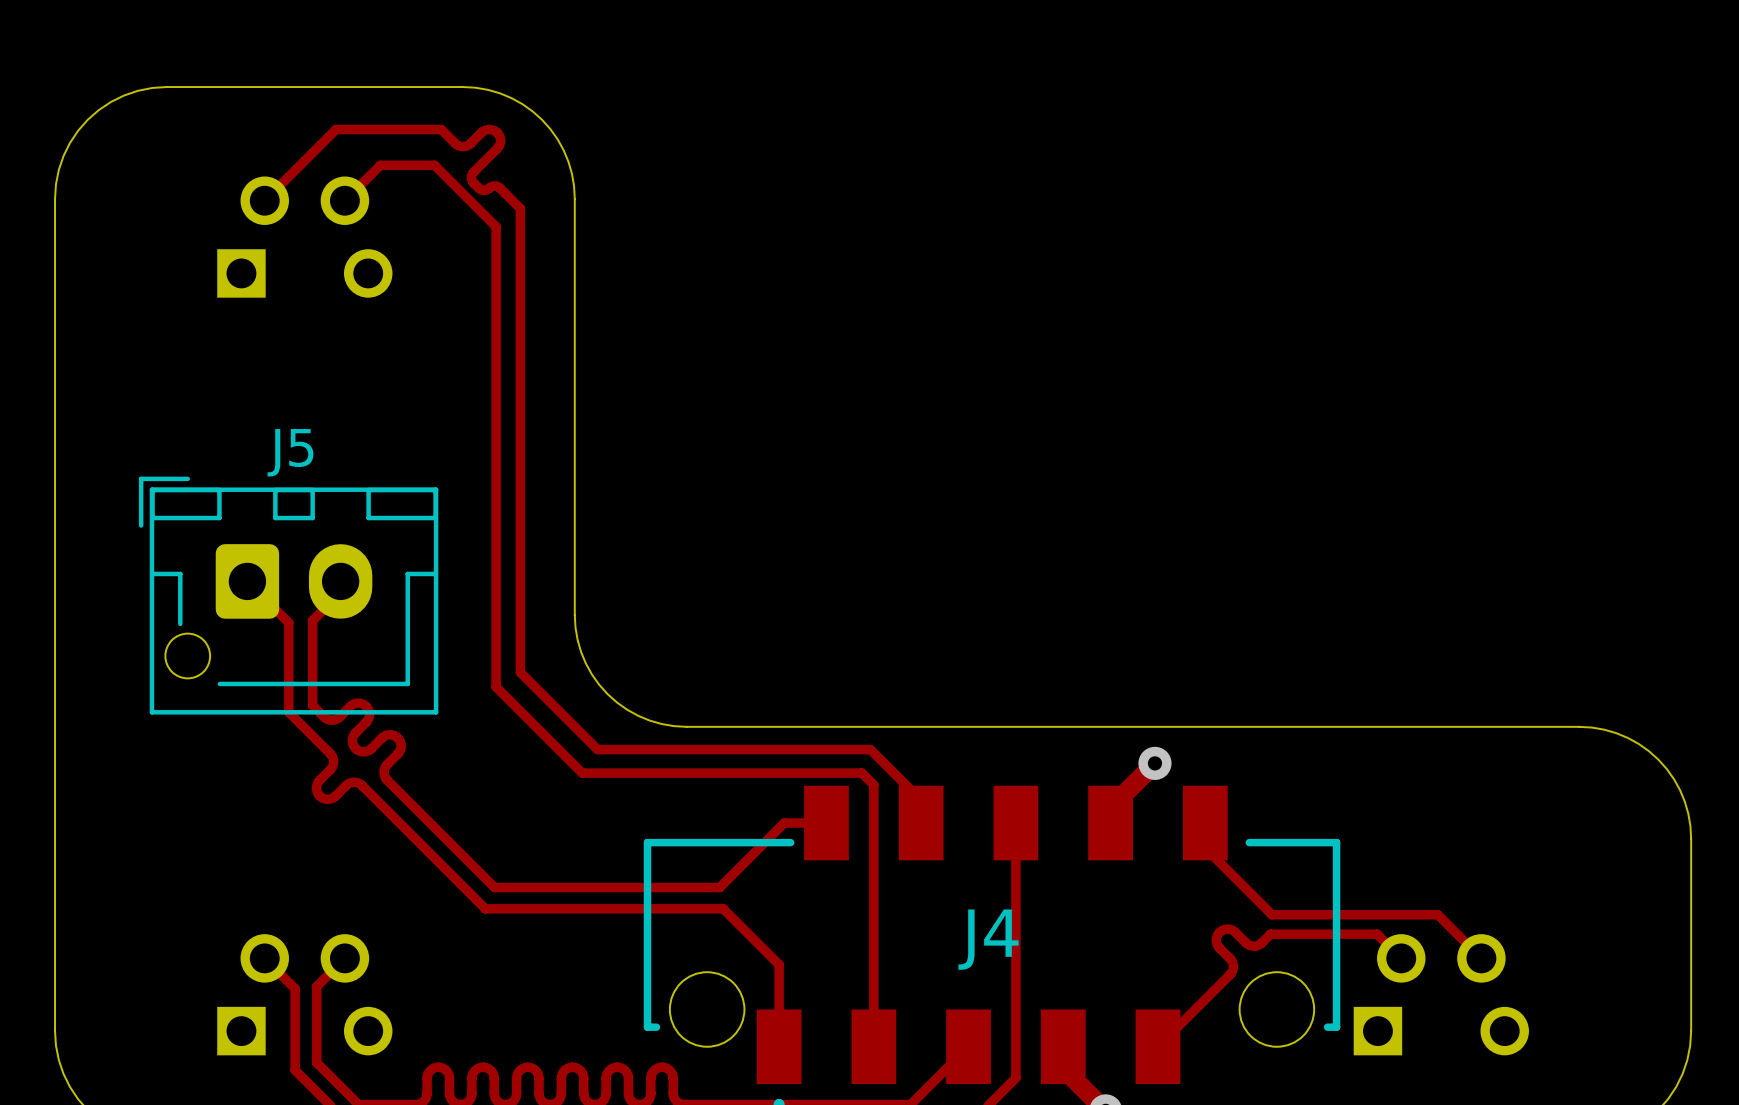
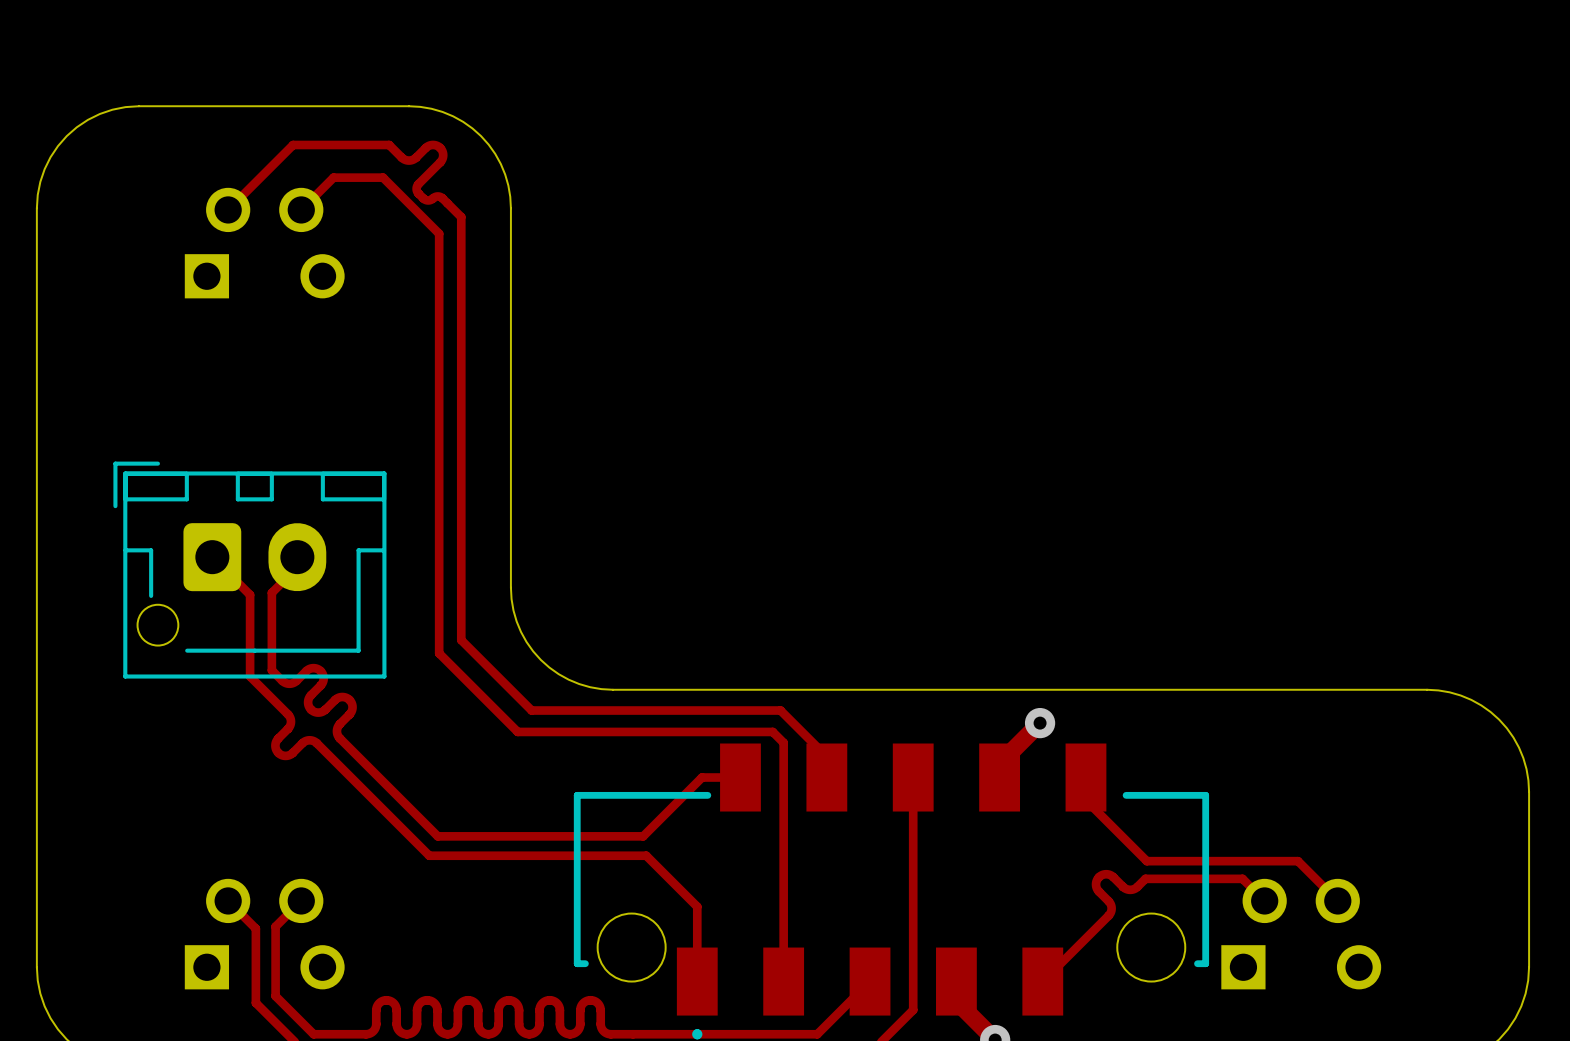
J5 name: J5 (290, 452) -> none
J4 name: J4 (988, 939) -> none

